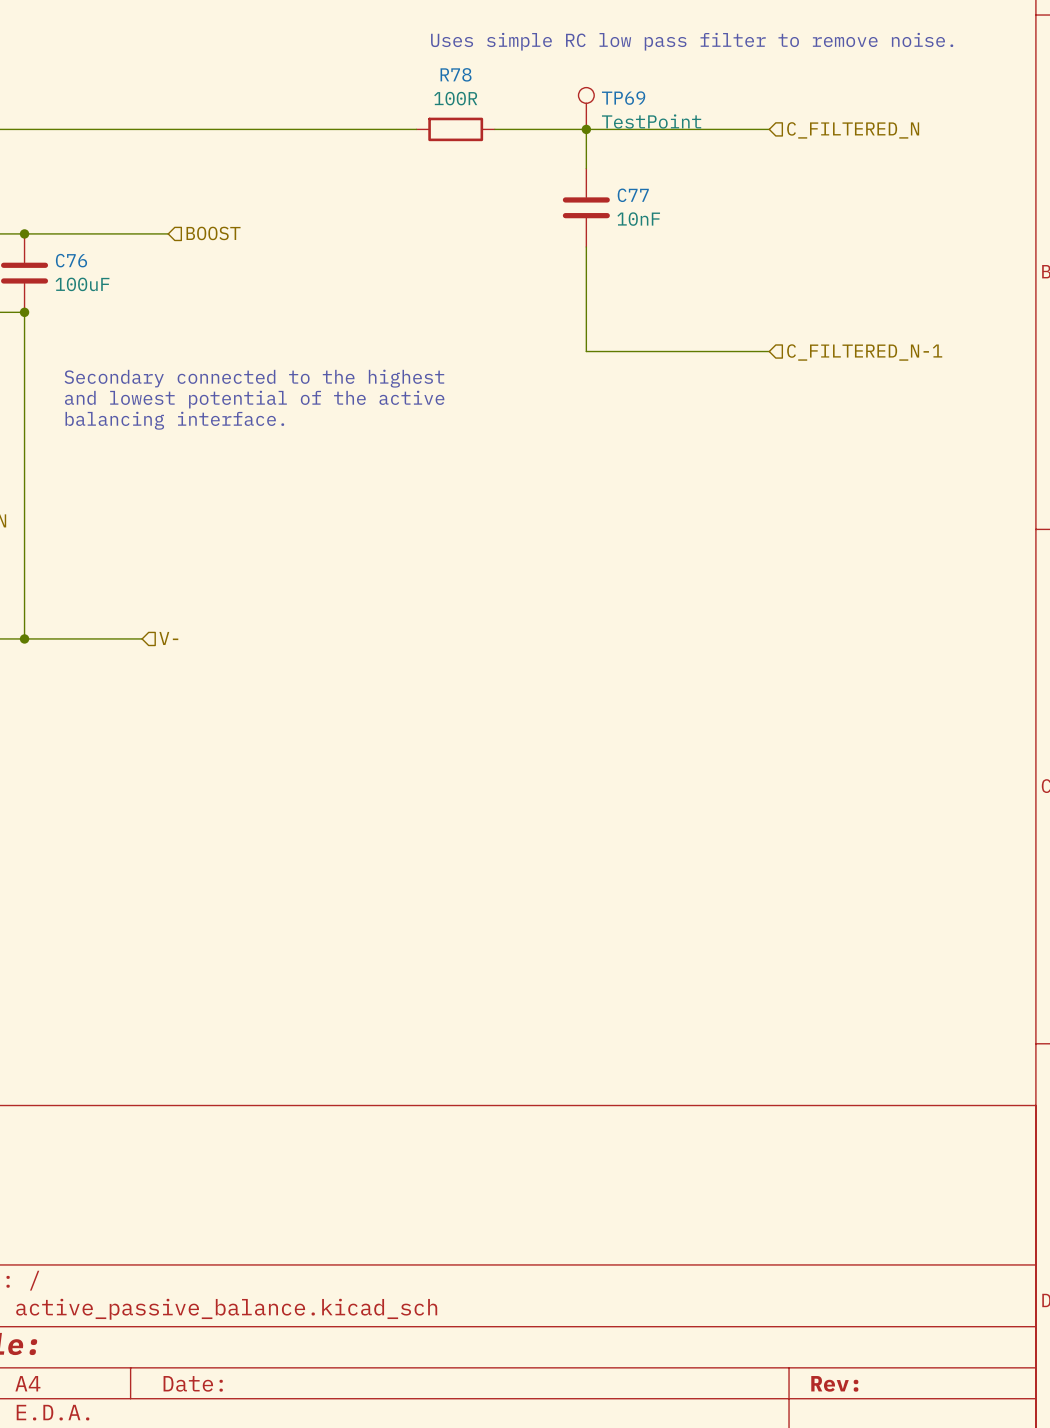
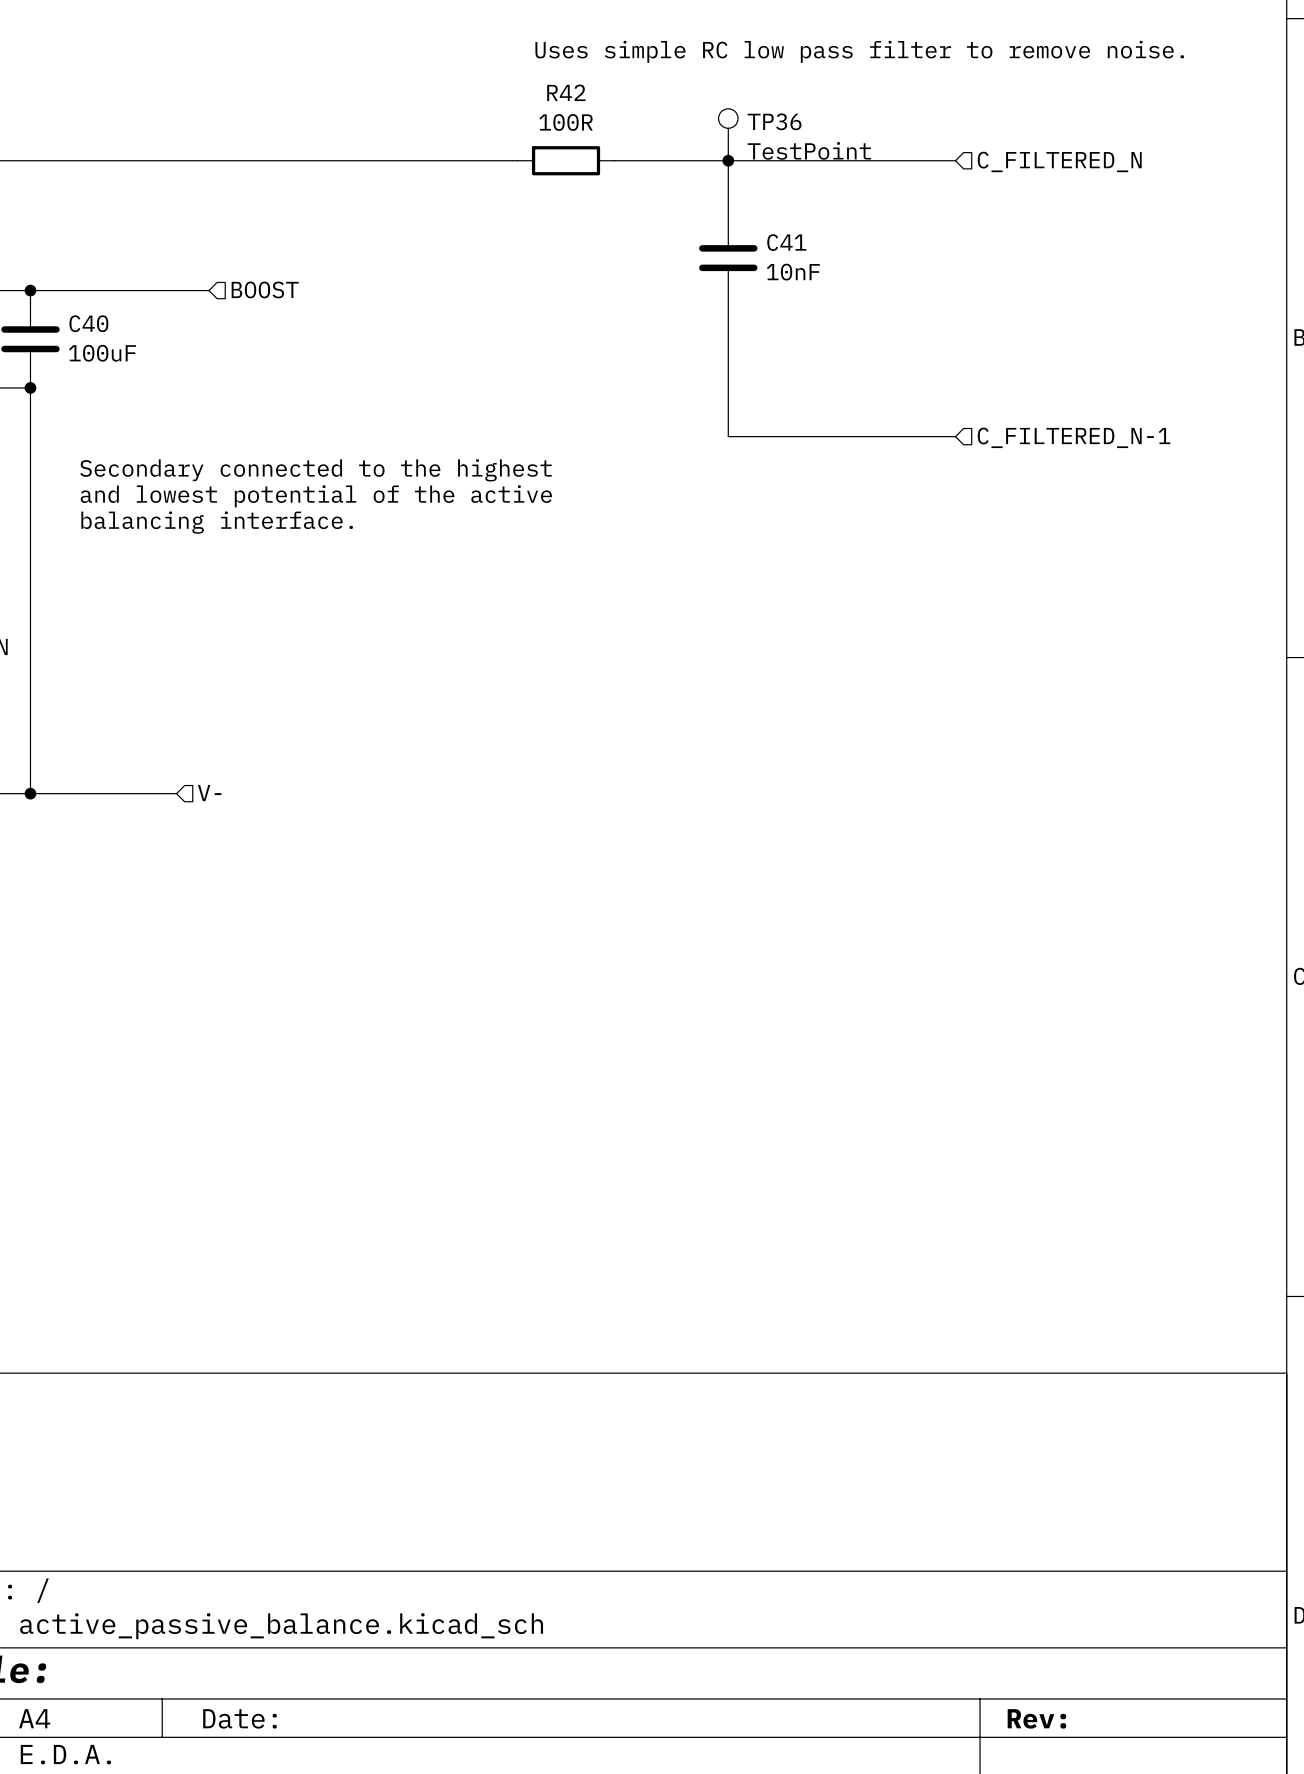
R78 name: R78 (456, 74) -> R42 (566, 92)
TP69 name: TP69 (623, 98) -> TP36 (774, 121)
C77 name: C77 (633, 195) -> C41 (786, 242)
C76 name: C76 (71, 260) -> C40 (88, 323)

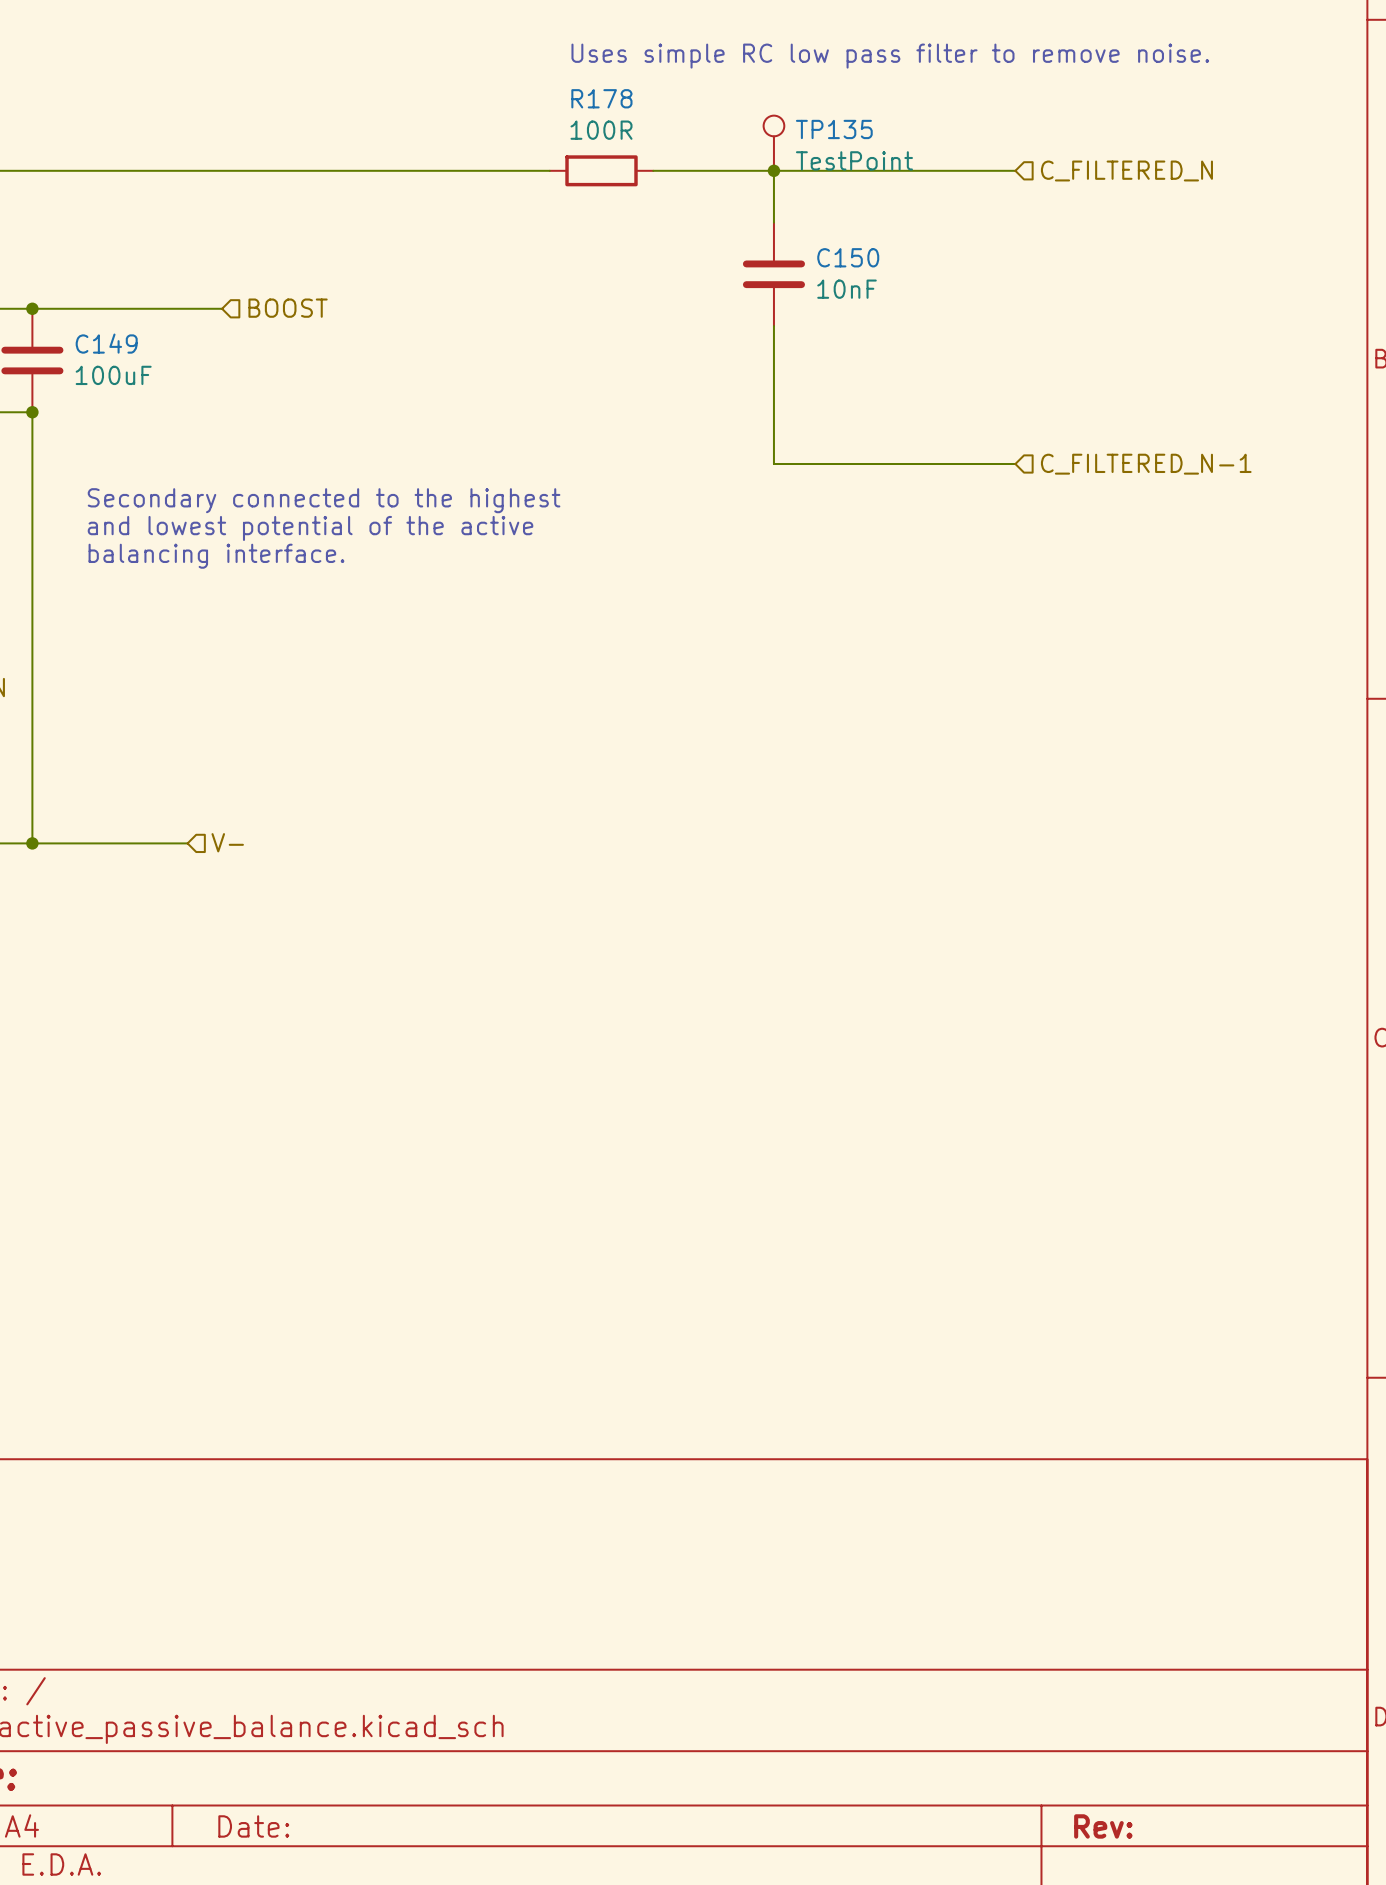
R42 name: R42 (566, 92) -> R178 (601, 98)
TP36 name: TP36 (774, 121) -> TP135 (834, 129)
C41 name: C41 (786, 242) -> C150 (848, 257)
C40 name: C40 (88, 323) -> C149 (106, 343)

